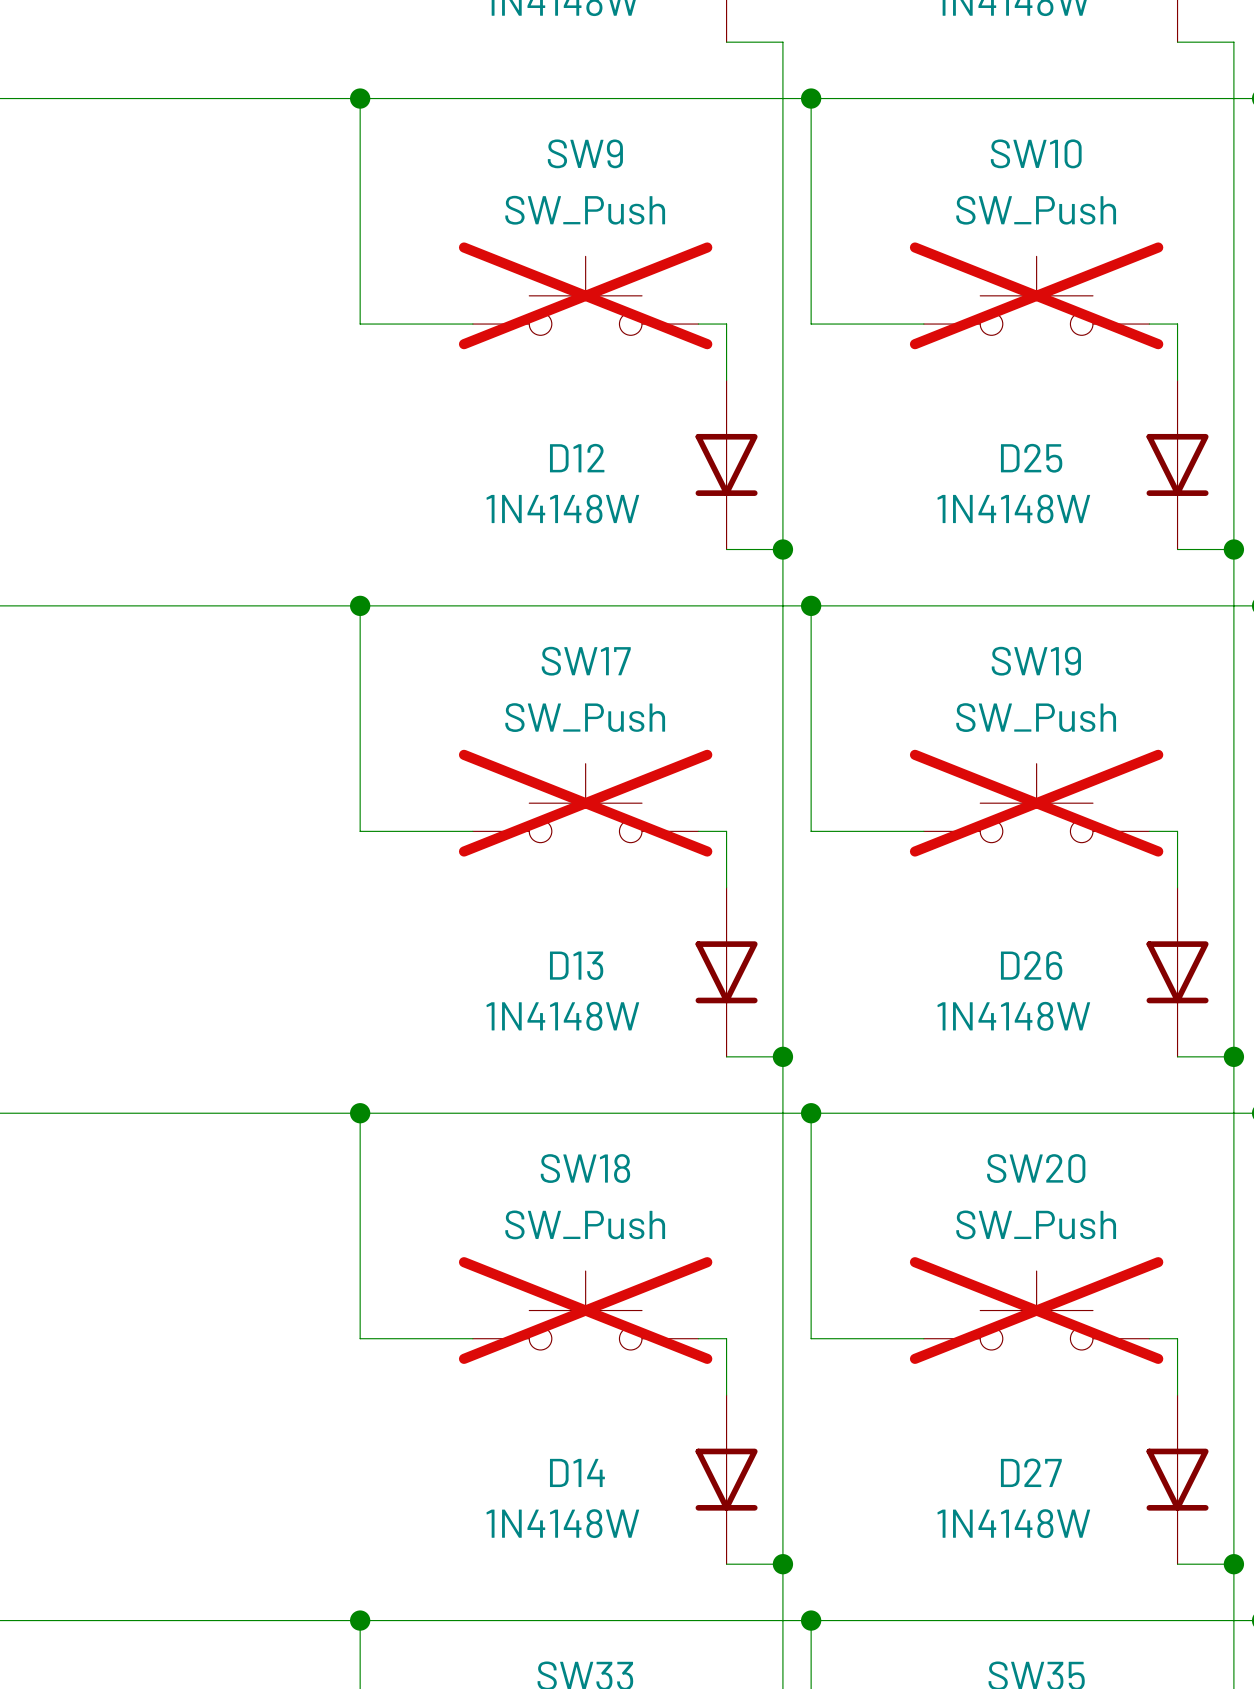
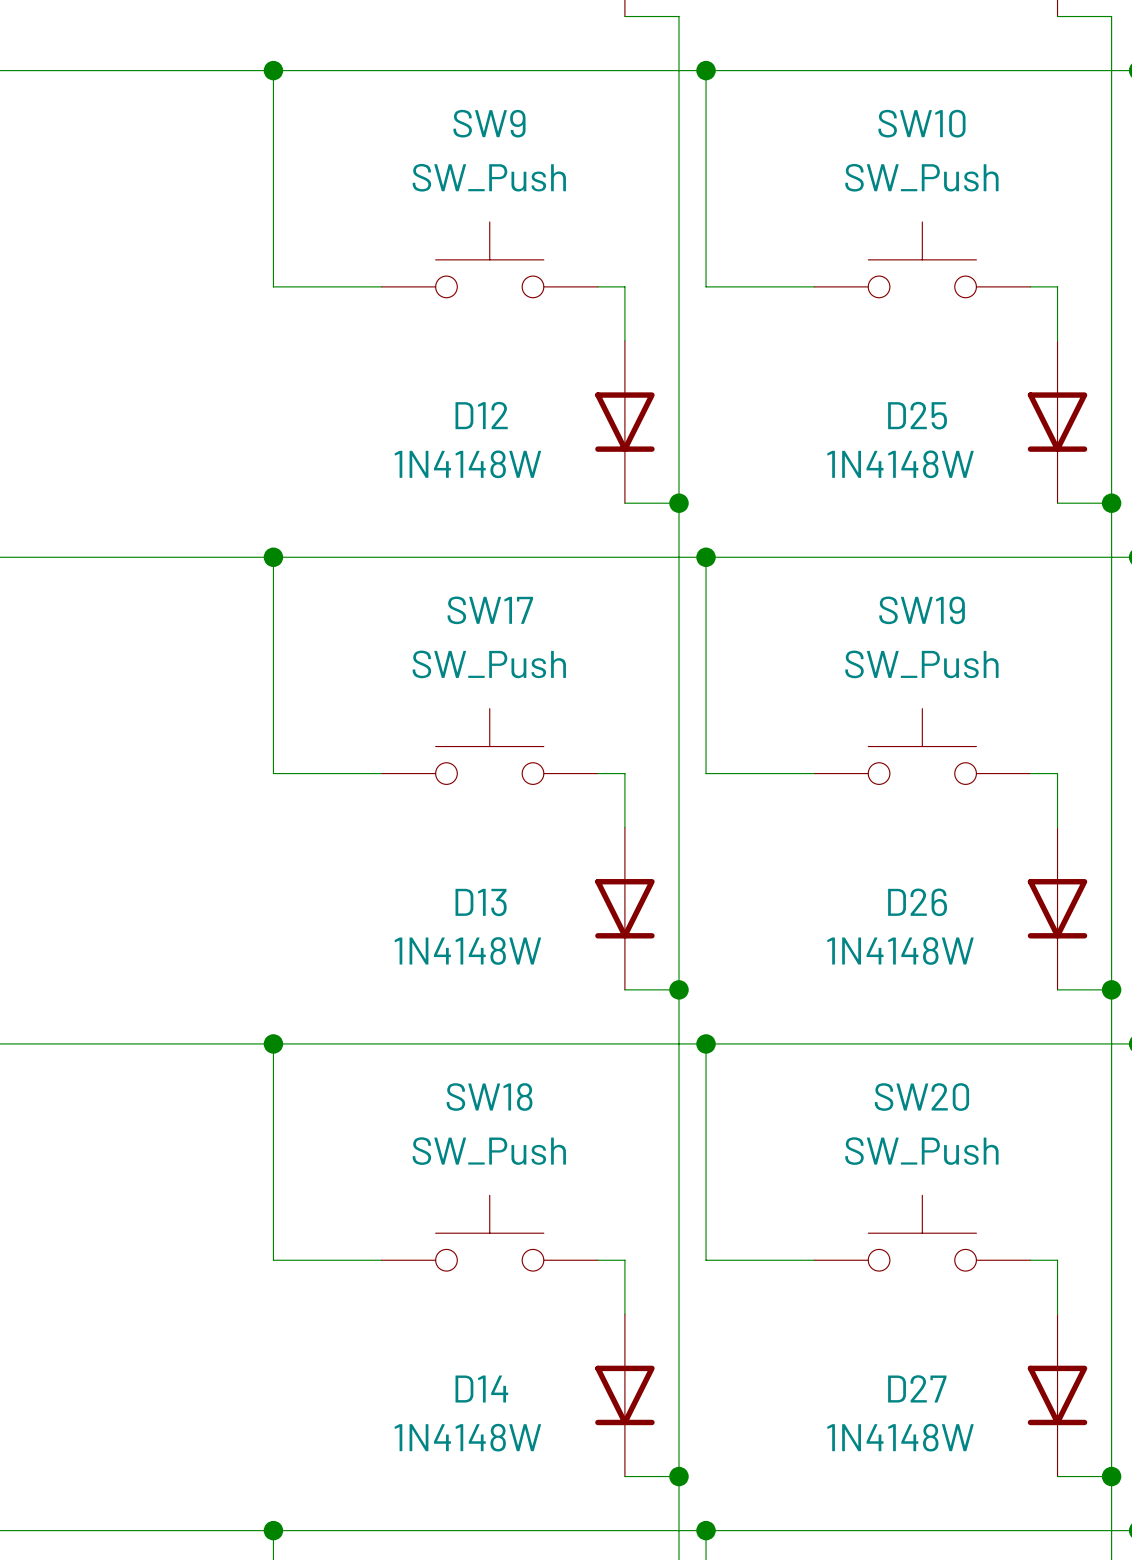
SW9 do-not-place cross: (585, 295) -> none
SW10 do-not-place cross: (1036, 295) -> none
SW17 do-not-place cross: (585, 803) -> none
SW19 do-not-place cross: (1036, 803) -> none
SW18 do-not-place cross: (585, 1310) -> none
SW20 do-not-place cross: (1036, 1310) -> none

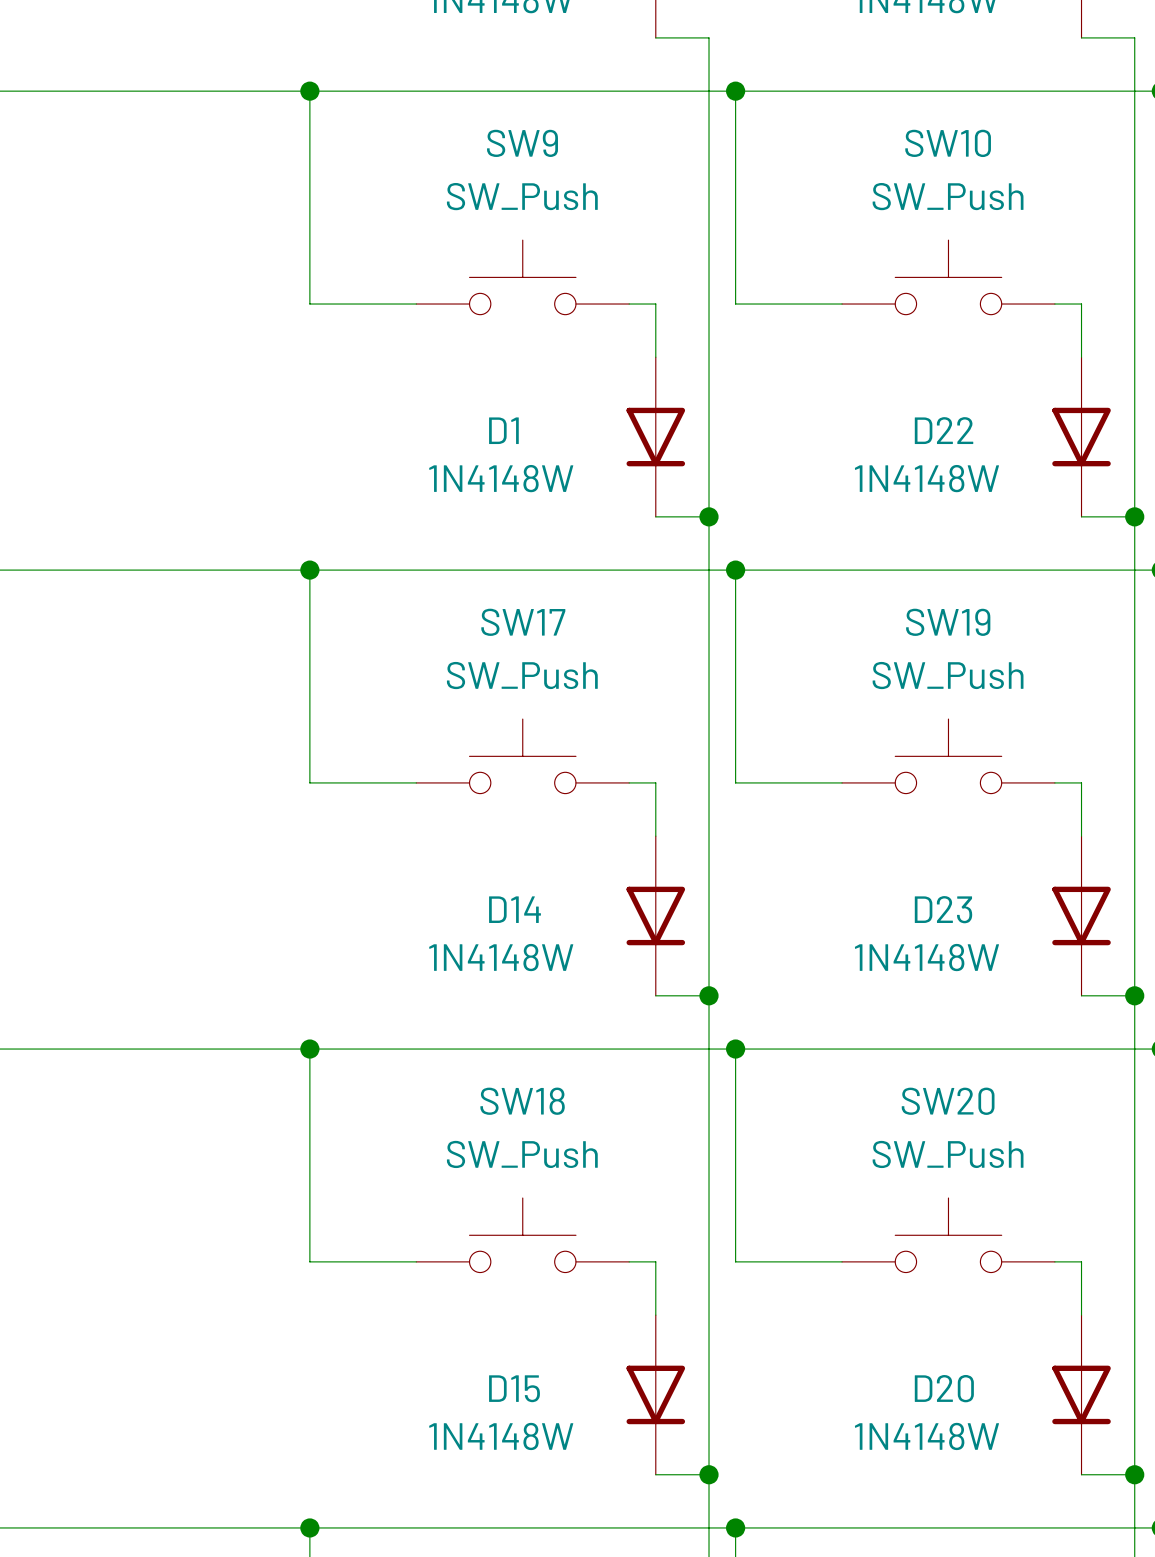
D12 name: D12 (481, 415) -> D1 (503, 430)
D25 name: D25 (917, 415) -> D22 (944, 430)
D13 name: D13 (481, 902) -> D14 (515, 909)
D26 name: D26 (917, 902) -> D23 (943, 909)
D27 name: D27 (917, 1388) -> D20 (944, 1388)
D14 name: D14 (481, 1389) -> D15 (514, 1388)

